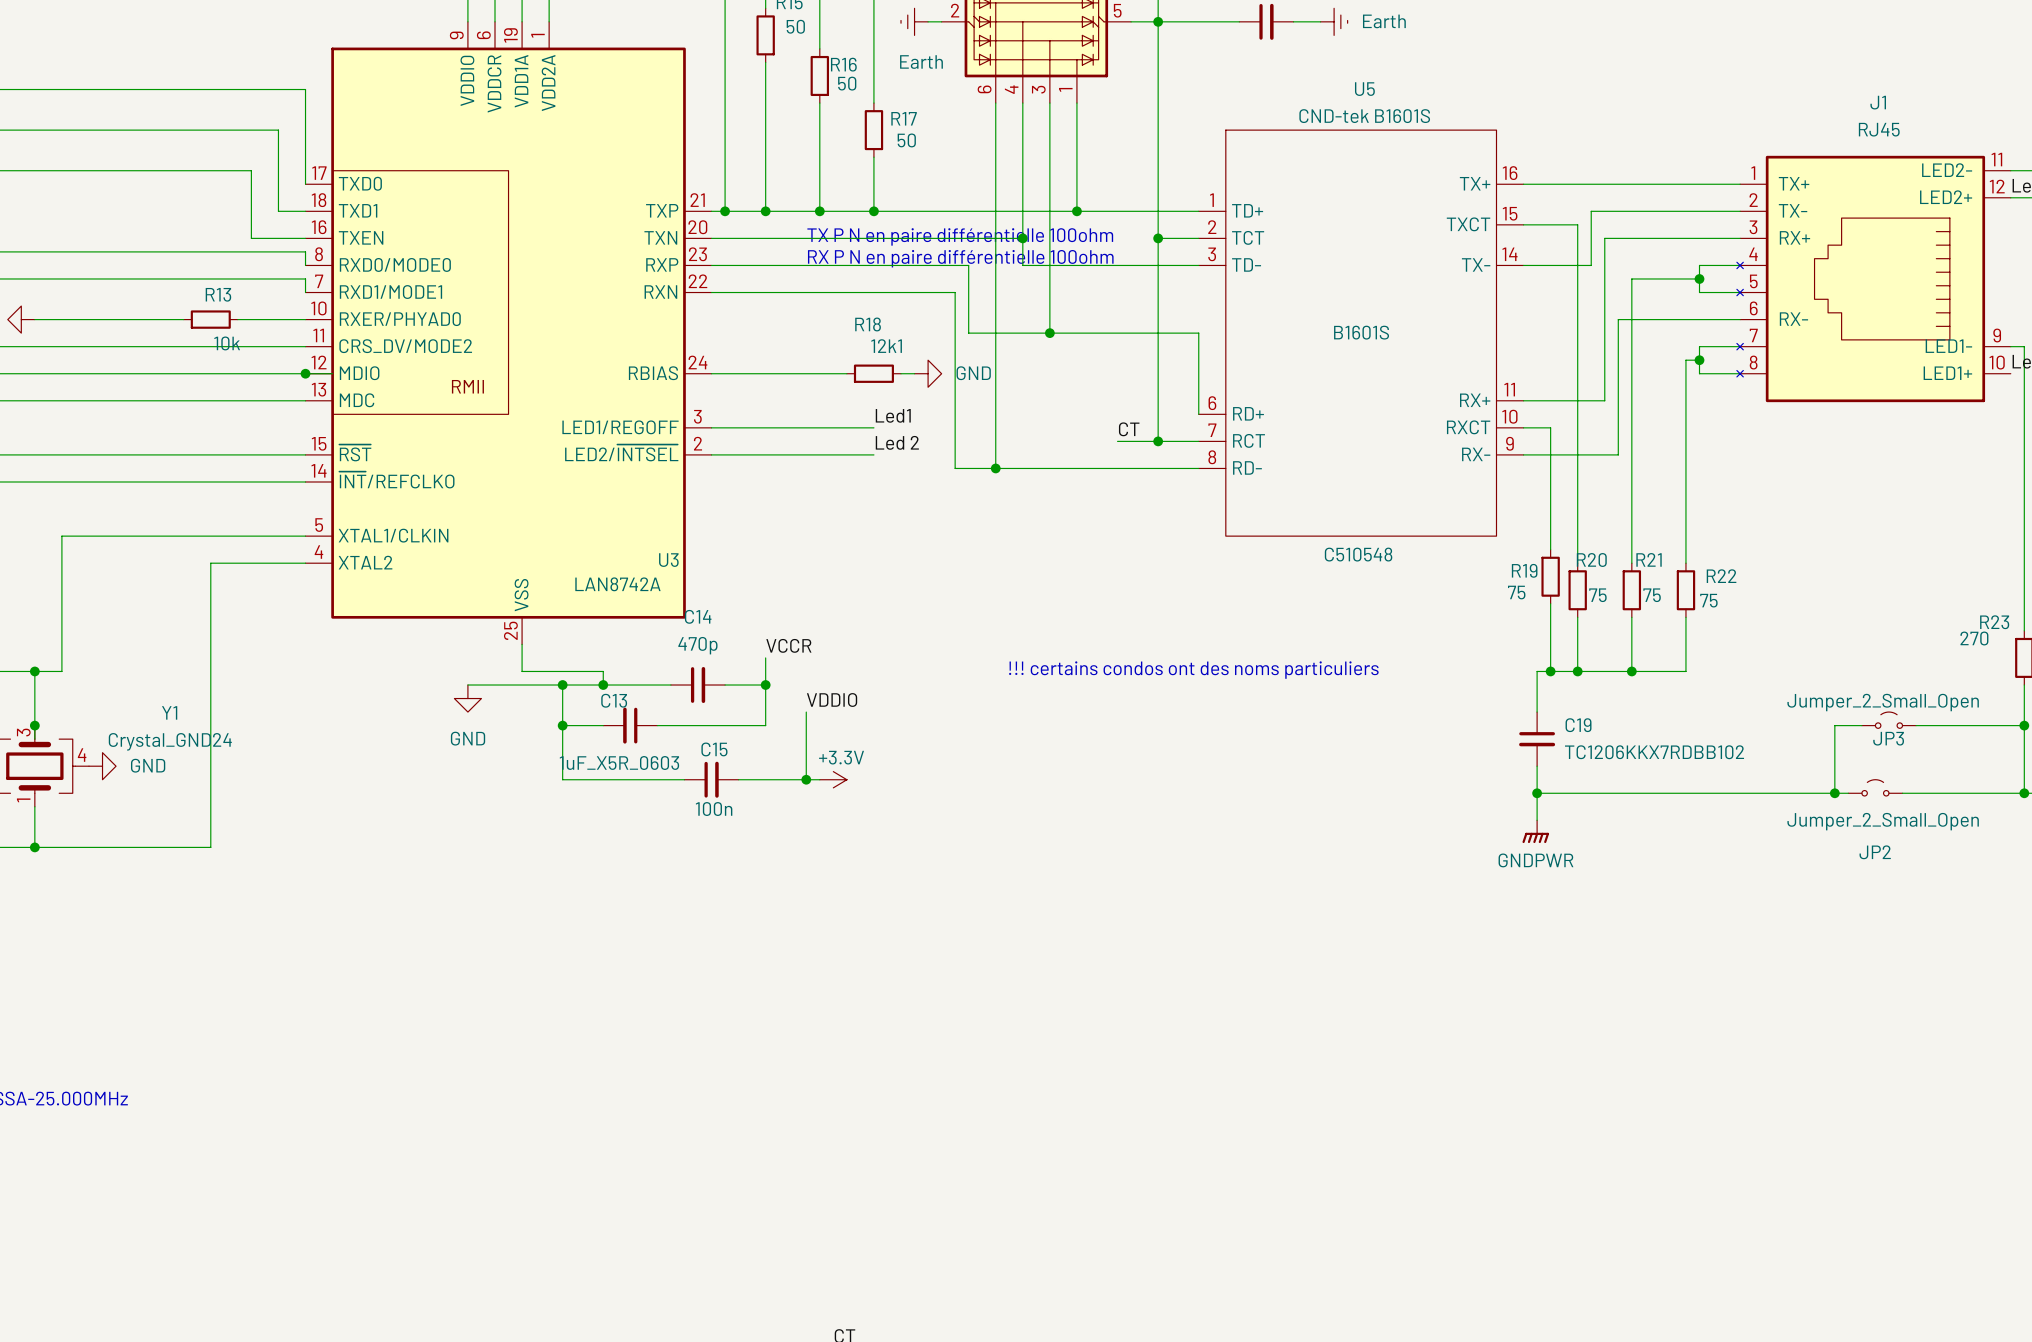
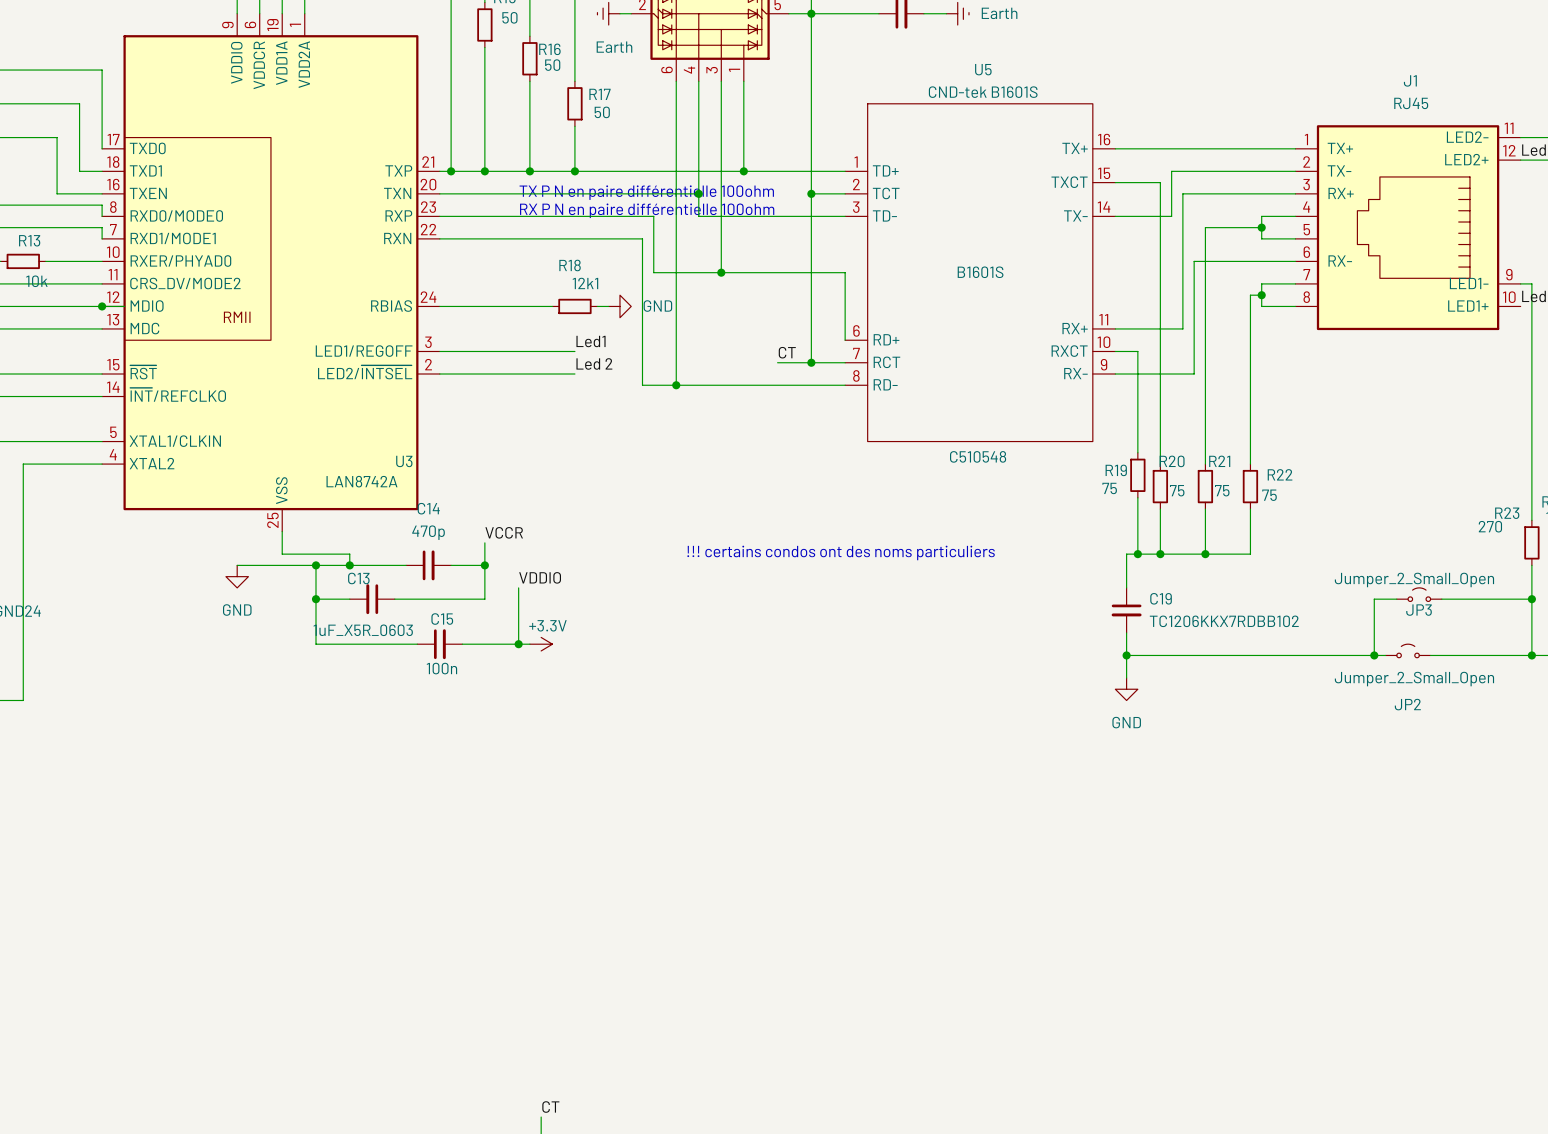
J1 symbol: [1736, 155, 2011, 403] -> [1295, 125, 1521, 331]
power symbol: GNDPWR (1535, 831) -> GND (1126, 689)

